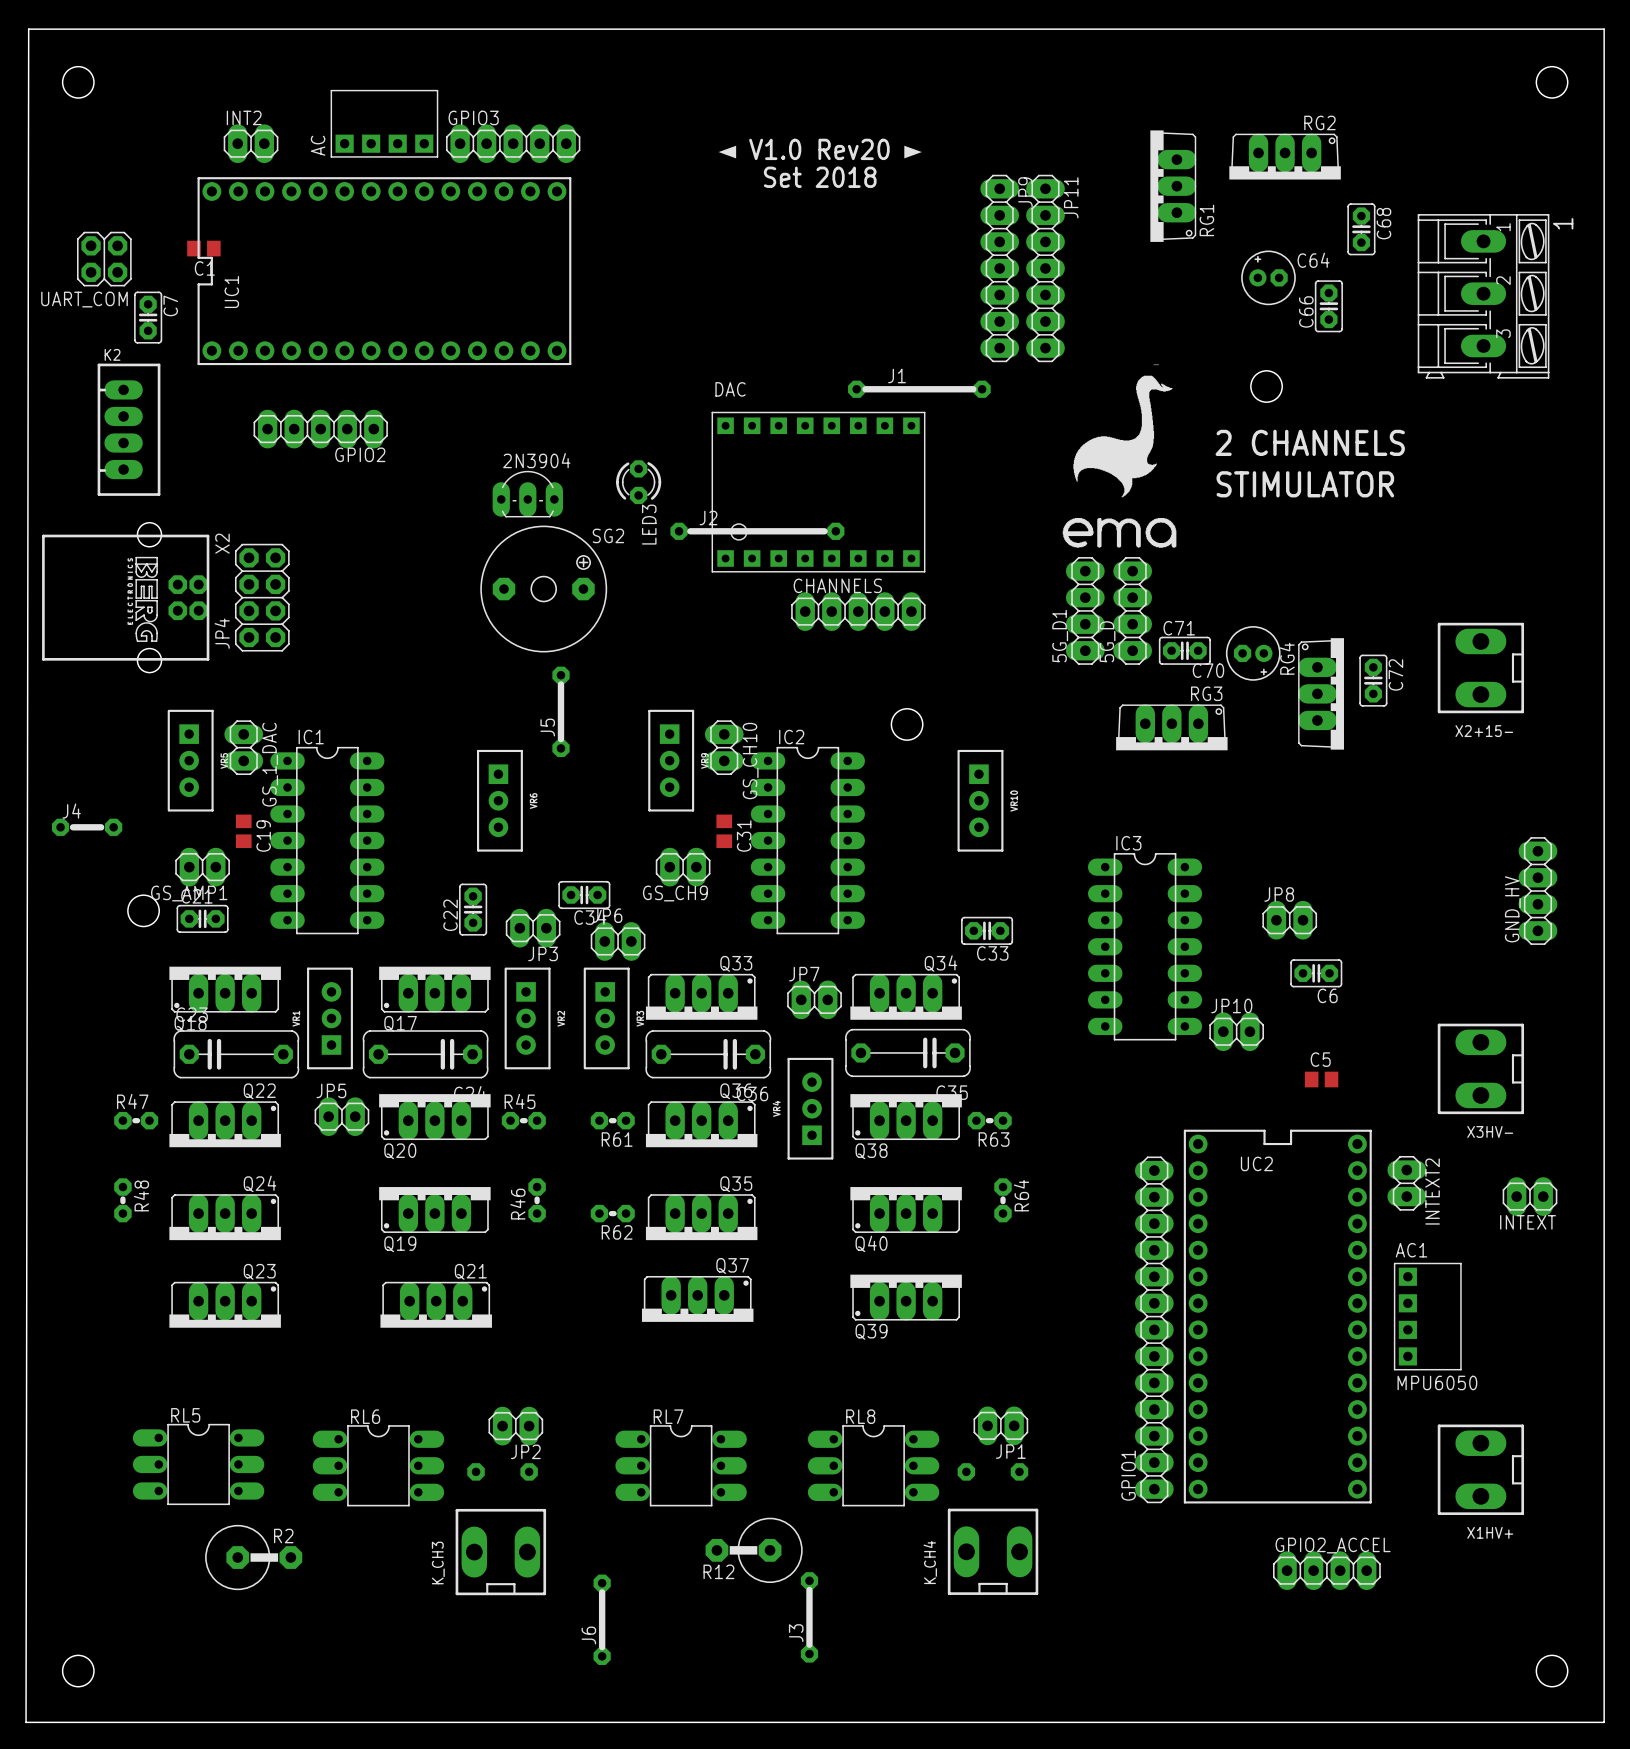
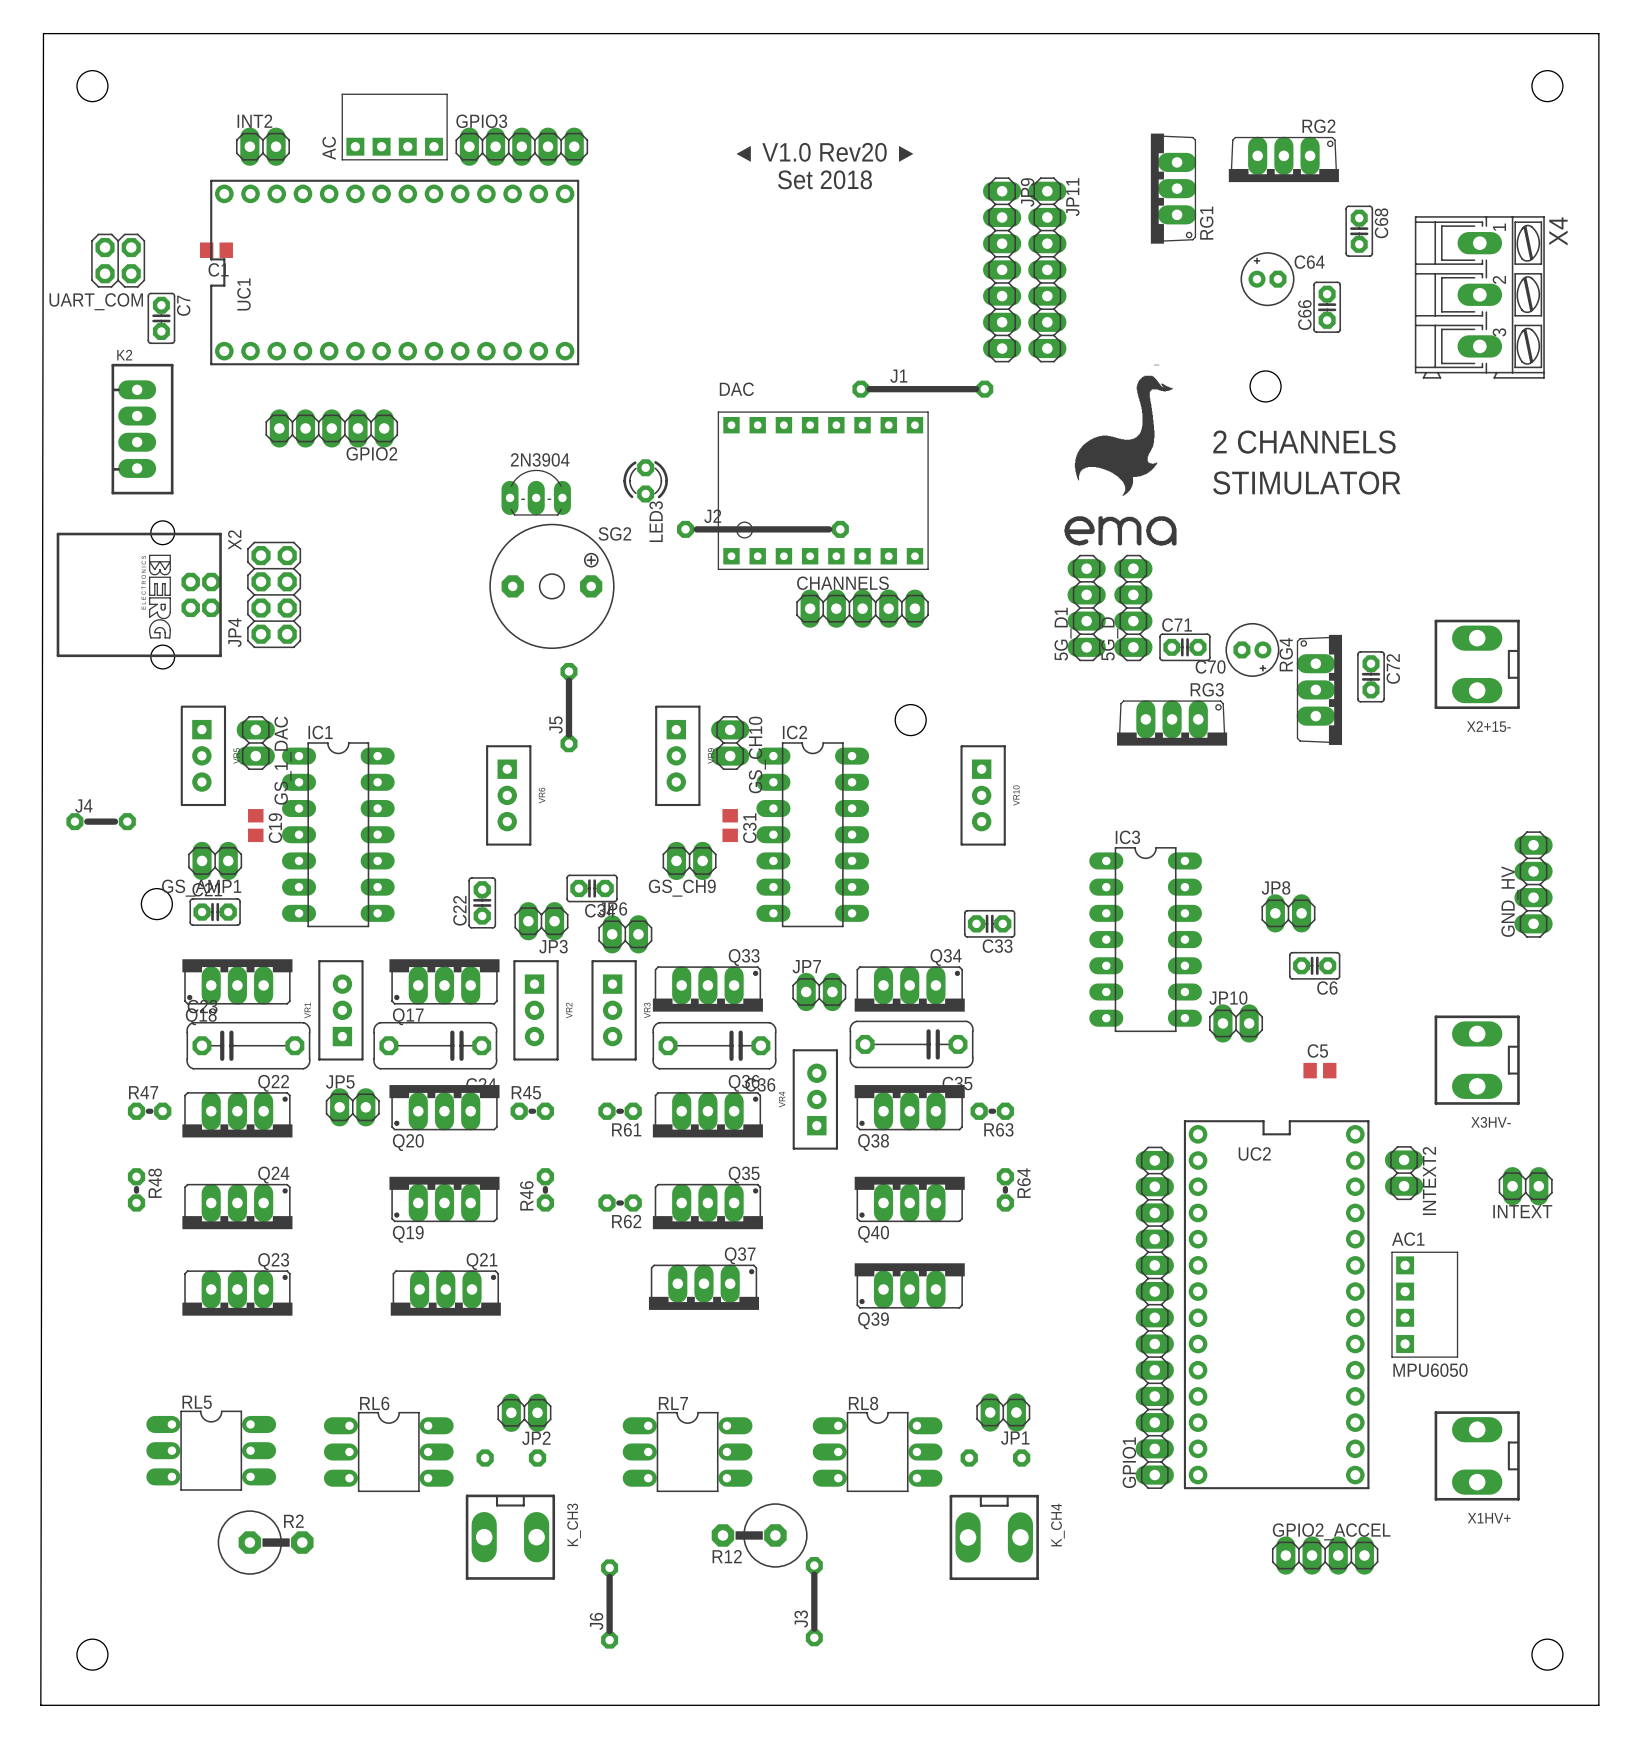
1 name: 1 (1563, 223) -> X4 (1558, 231)
K_CH4 rotation: 0° (993, 1551) -> 180° (994, 1537)
K_CH3 rotation: 0° (500, 1552) -> 180° (510, 1537)

